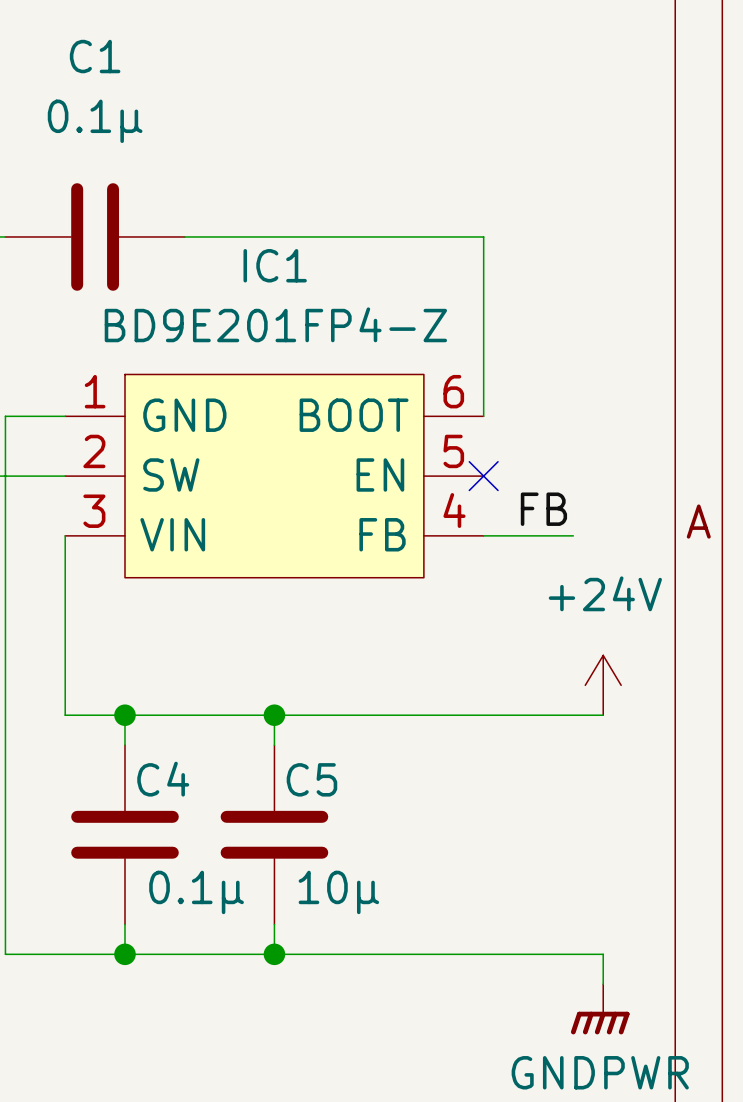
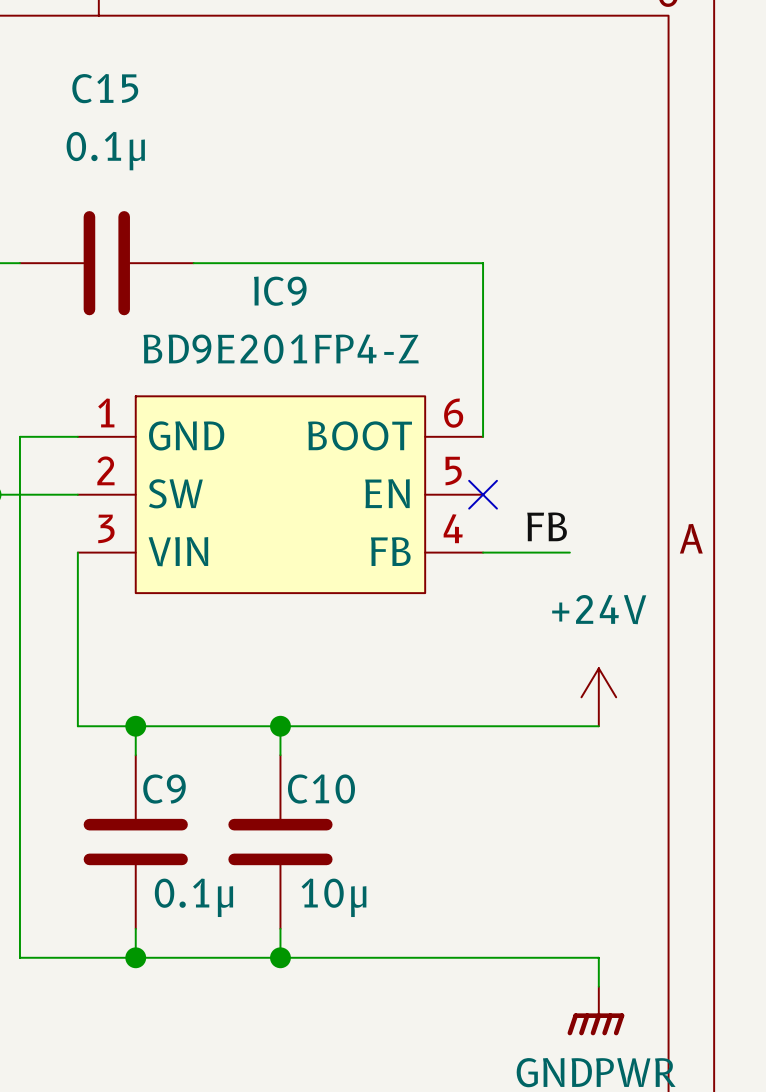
C1 name: C1 (95, 56) -> C15 (105, 88)
IC1 name: IC1 (275, 265) -> IC9 (280, 291)
C4 name: C4 (163, 779) -> C9 (164, 789)
C5 name: C5 (311, 779) -> C10 (321, 789)

